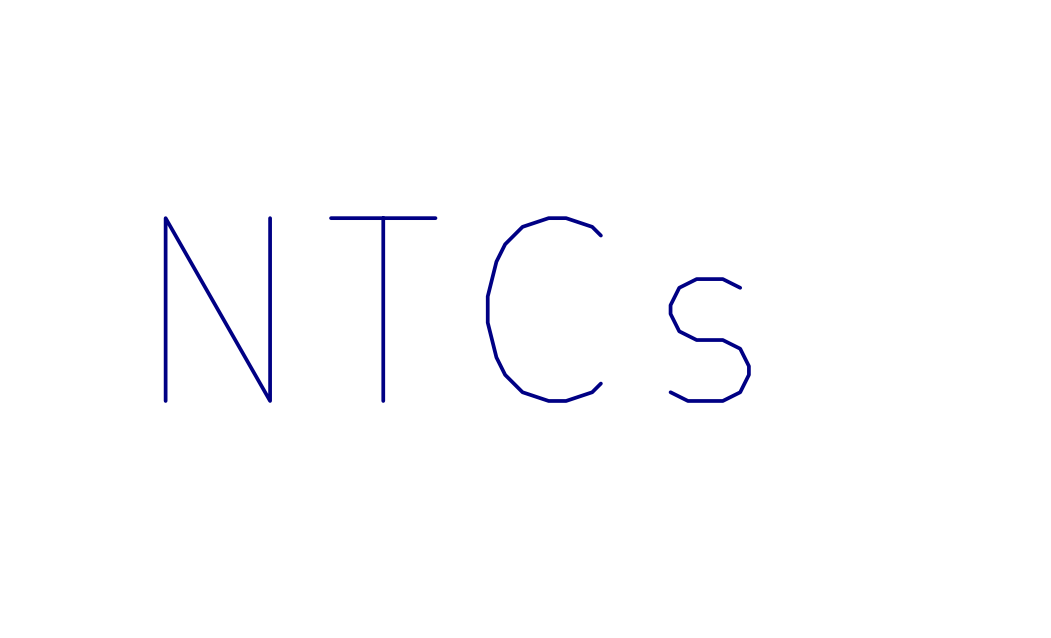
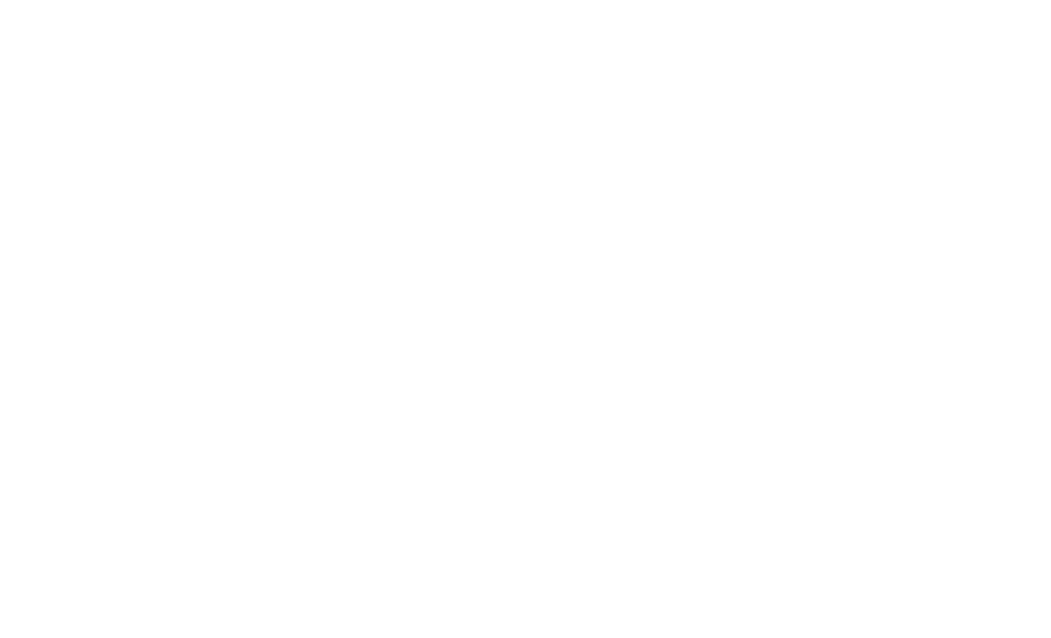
text: NTCs (457, 309) -> none

